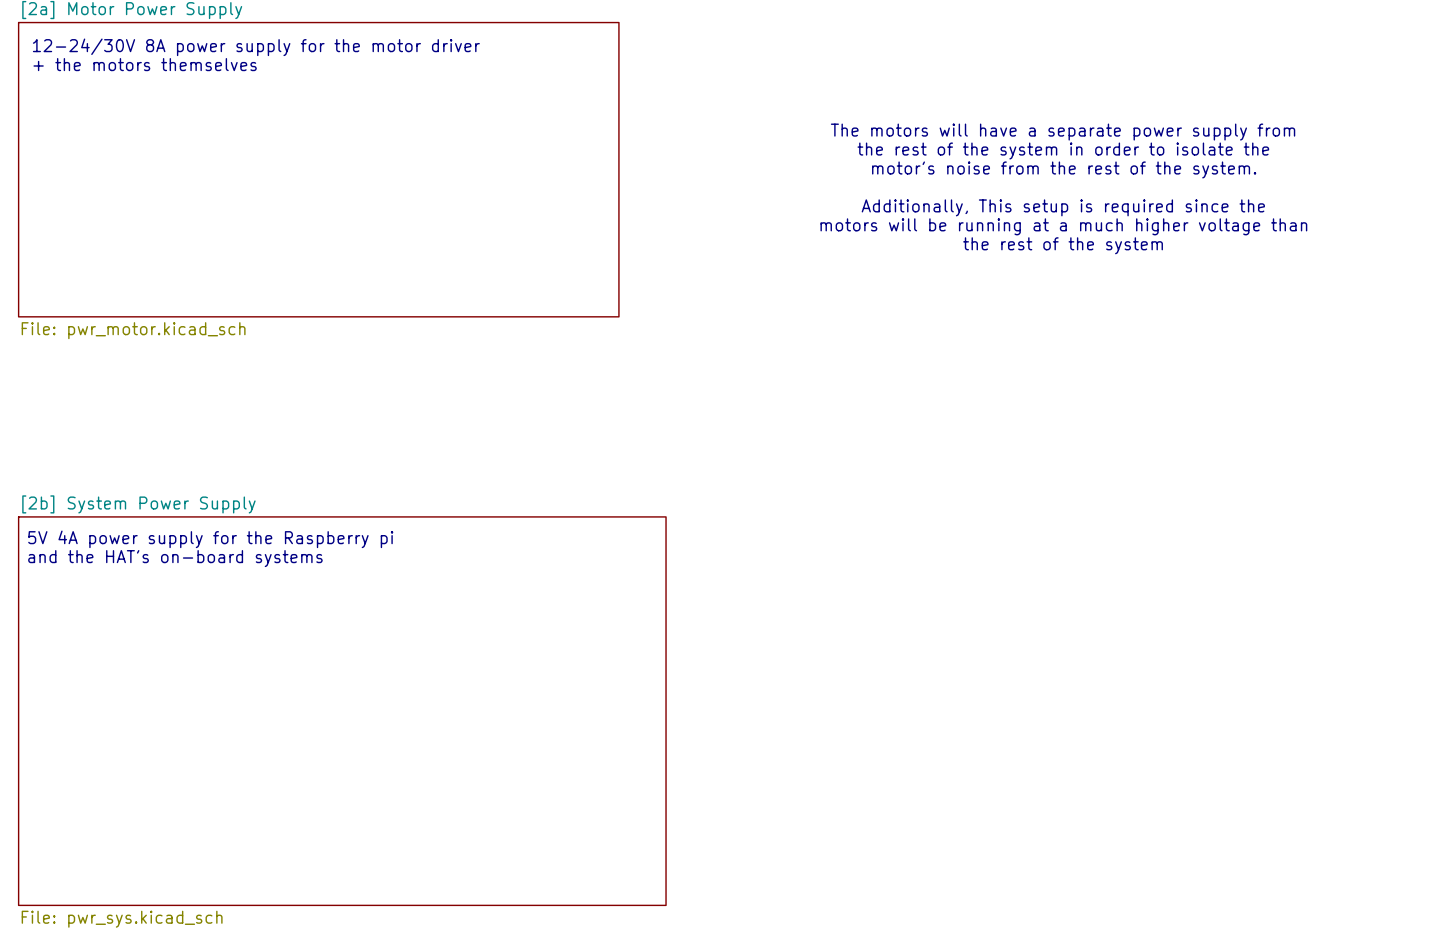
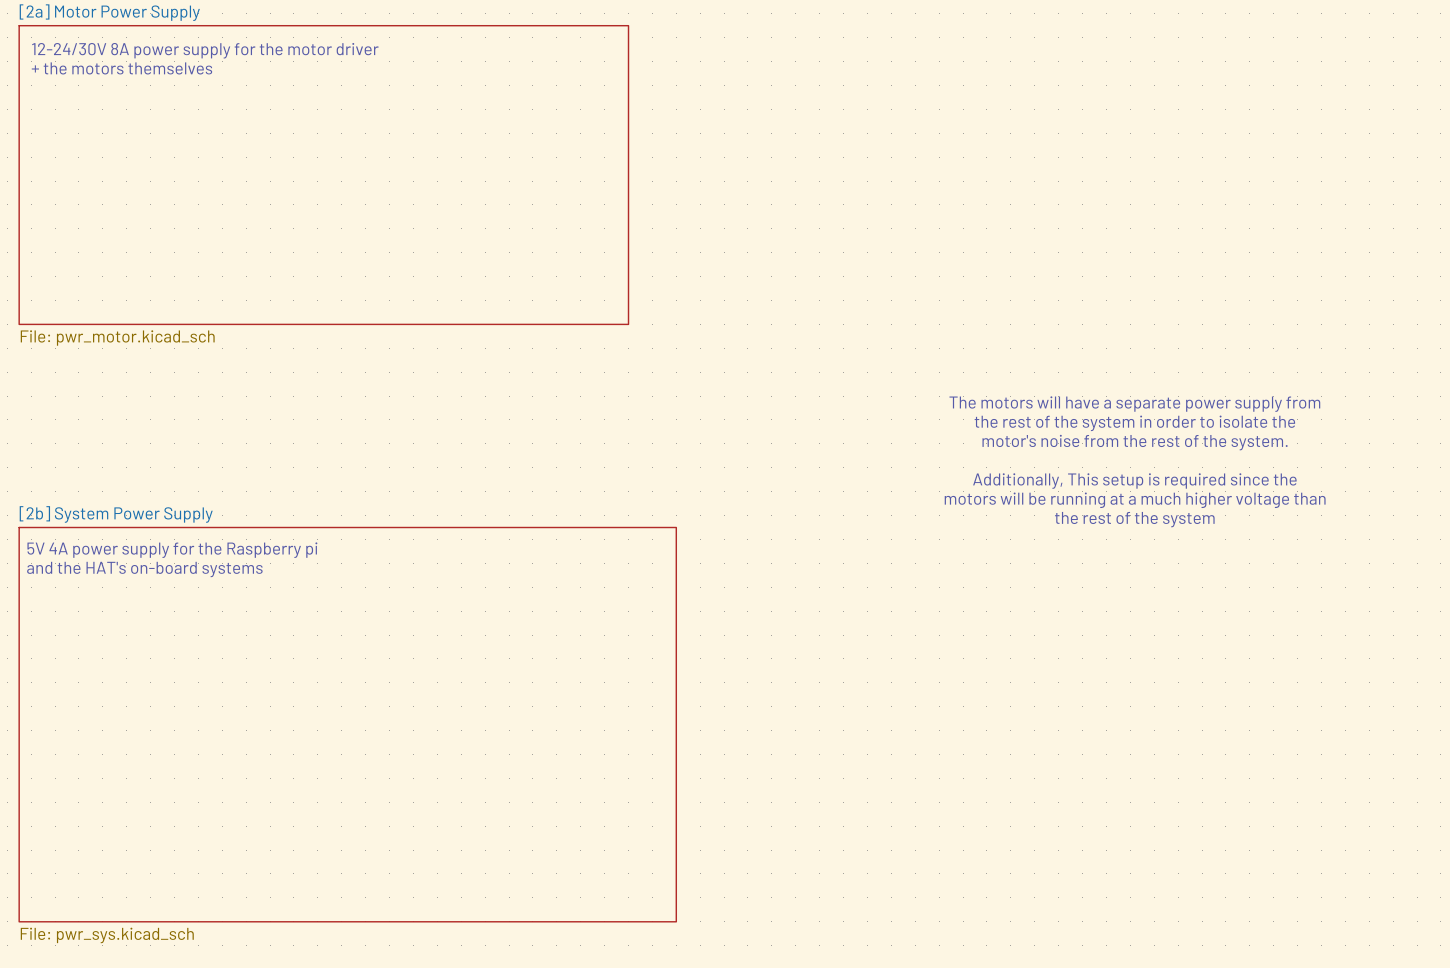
text: The motors will have a separate power supply from (1063, 132) -> none
text: the rest of the system in order to isolate the (1063, 151) -> none
text: motor's noise from the rest of the system. (1064, 169) -> none
text: Additionally, This setup is required since the (1063, 207) -> none
text: motors will be running at a much higher voltage than (1063, 226) -> none
text: the rest of the system (1063, 245) -> none
text: none -> The motors will have a separate power supply from (1134, 404)
text: none -> the rest of the system in order to isolate the (1134, 423)
text: none -> motor's noise from the rest of the system. (1135, 442)
text: none -> Additionally, This setup is required since the (1134, 481)
text: none -> motors will be running at a much higher voltage than (1135, 500)
text: none -> the rest of the system (1134, 519)

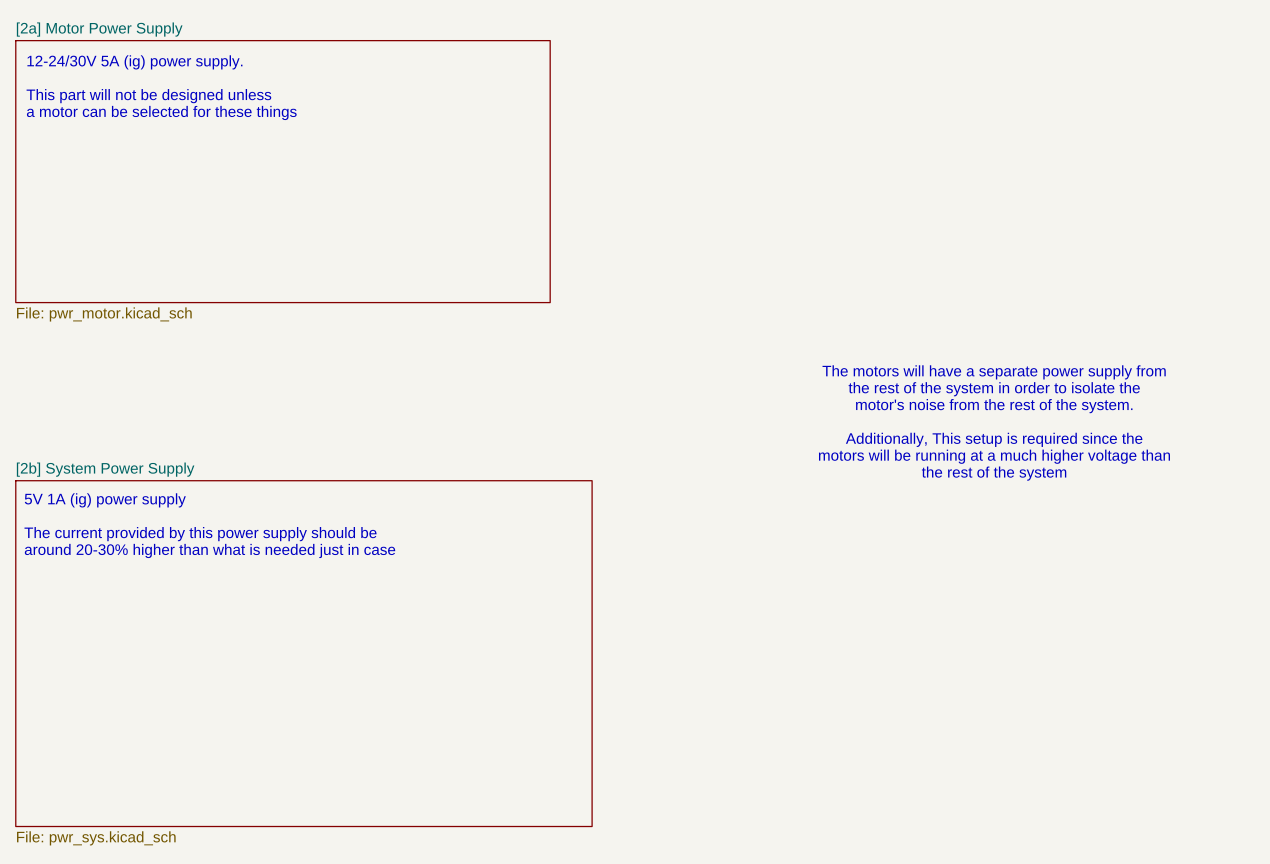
text: 12-24/30V 8A power supply for the motor driver (205, 50) -> 12-24/30V 5A (ig) power supply. (134, 62)
text: + the motors themselves (121, 68) -> none
text: none -> This part will not be designed unless (148, 96)
text: none -> a motor can be selected for these things (161, 112)
text: 5V 4A power supply for the Raspberry pi (172, 550) -> 5V 1A (ig) power supply (105, 500)
text: and the HAT's on-board systems (144, 569) -> none
text: none -> The current provided by this power supply should be (200, 534)
text: none -> around 20-30% higher than what is needed just in case (210, 550)

